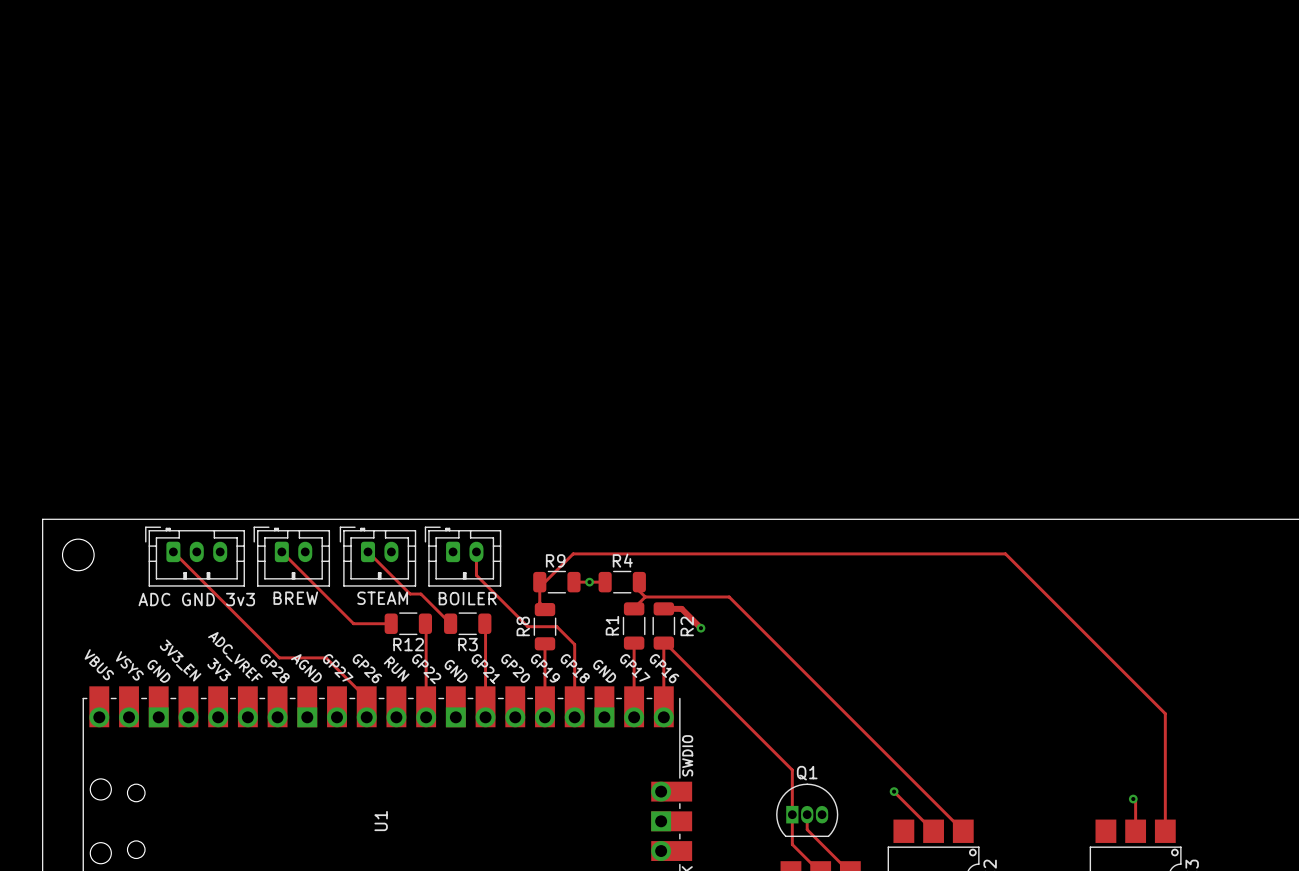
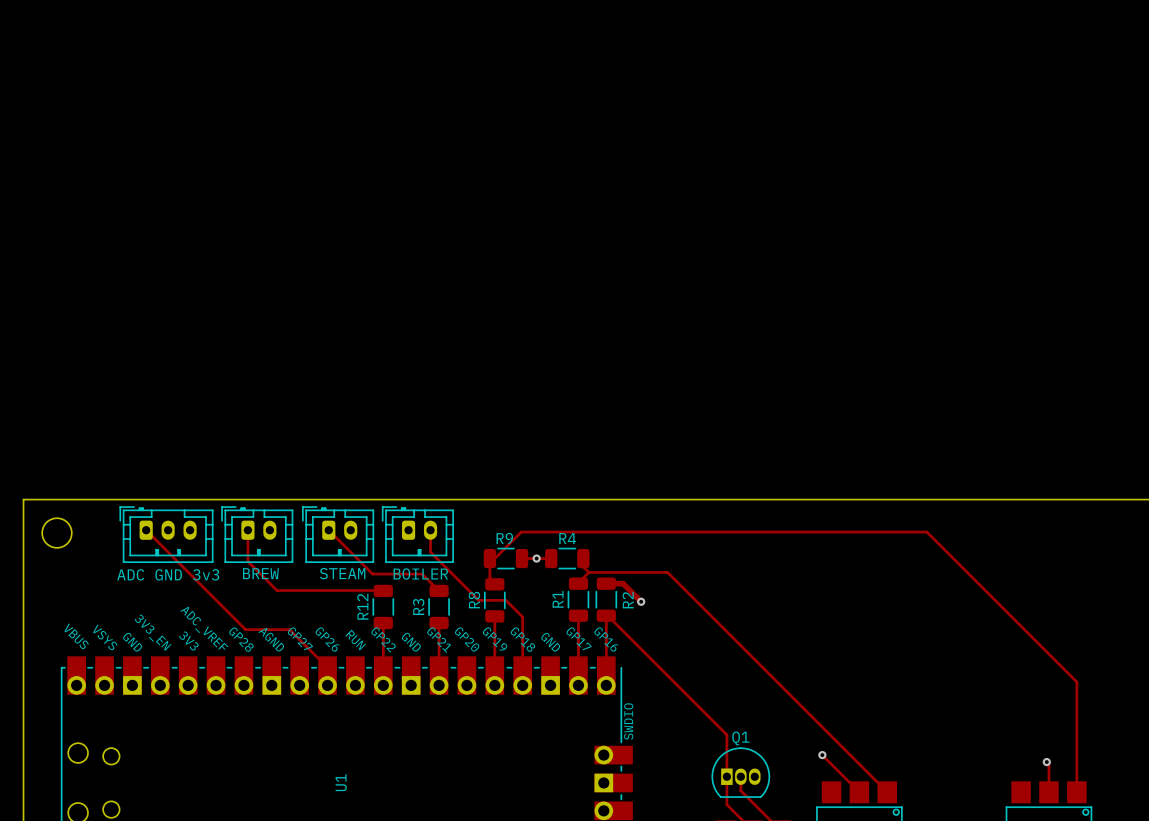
track: (281, 551) (353, 623) (391, 623) -> (247, 530) (247, 561) (276, 590) (383, 590)
track: (410, 594) (420, 594) (450, 623) -> (368, 569) (372, 574) (422, 574) (439, 590)
R12 rotation: 0° (408, 623) -> 90° clockwise (383, 606)
track: (425, 623) (426, 650) -> none
R3 rotation: 0° (467, 623) -> 90° clockwise (439, 606)
track: (484, 623) (485, 650) -> none

